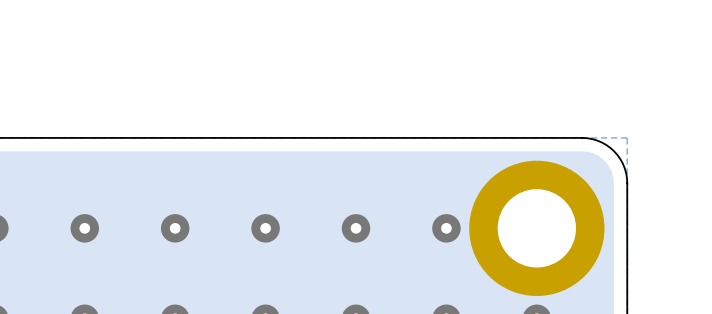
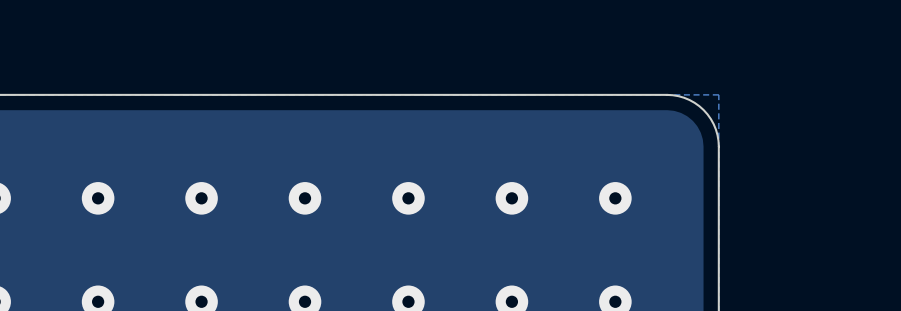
part: (536, 228) -> none
via: none -> (615, 198)

